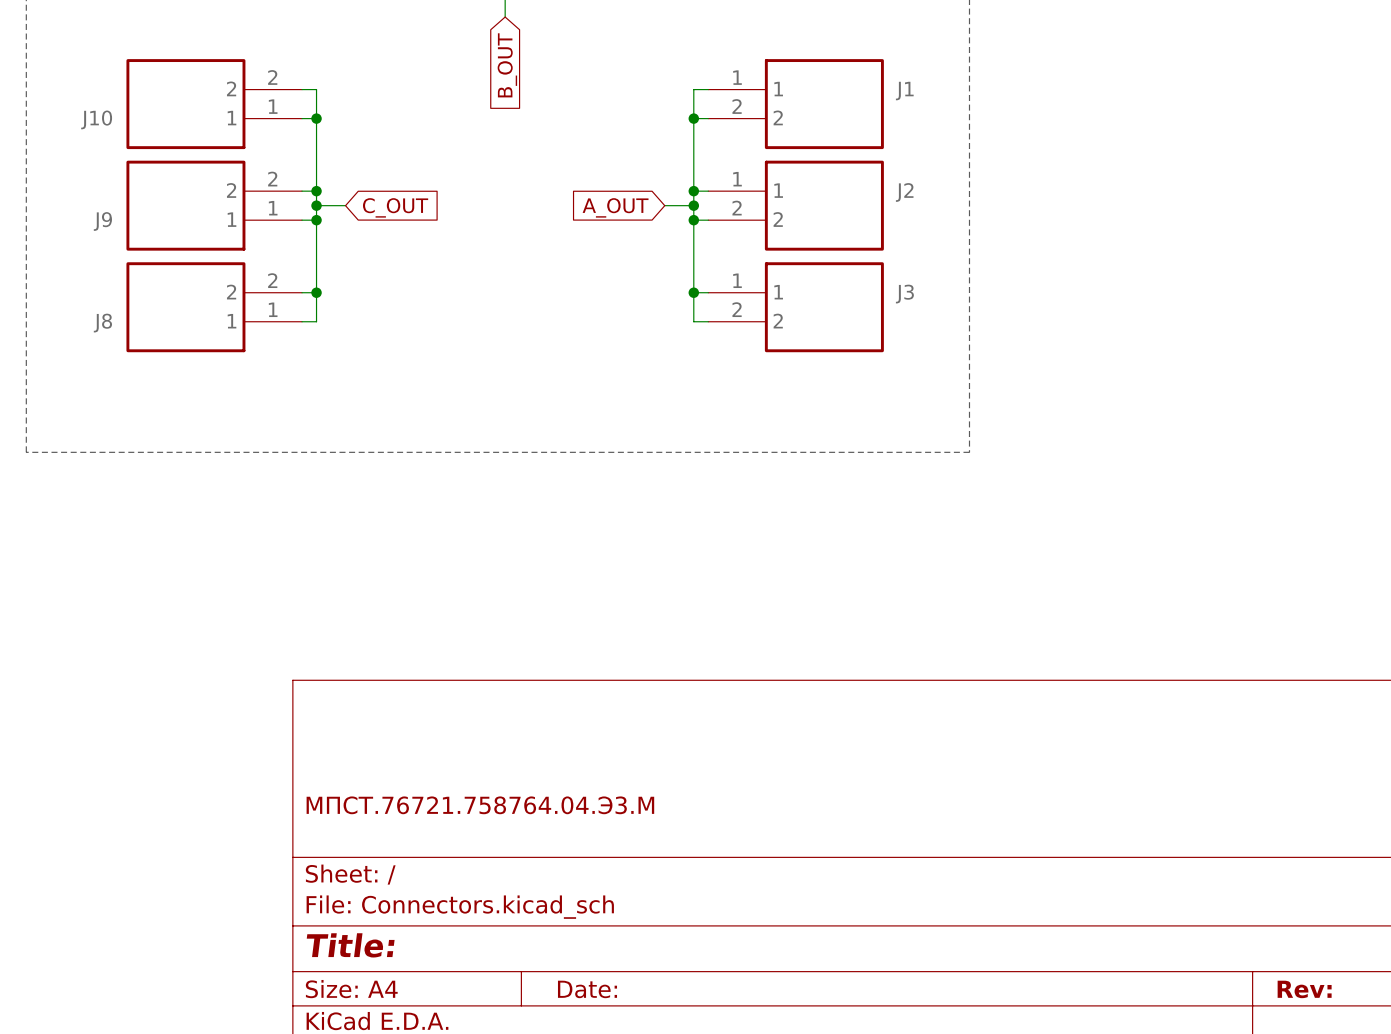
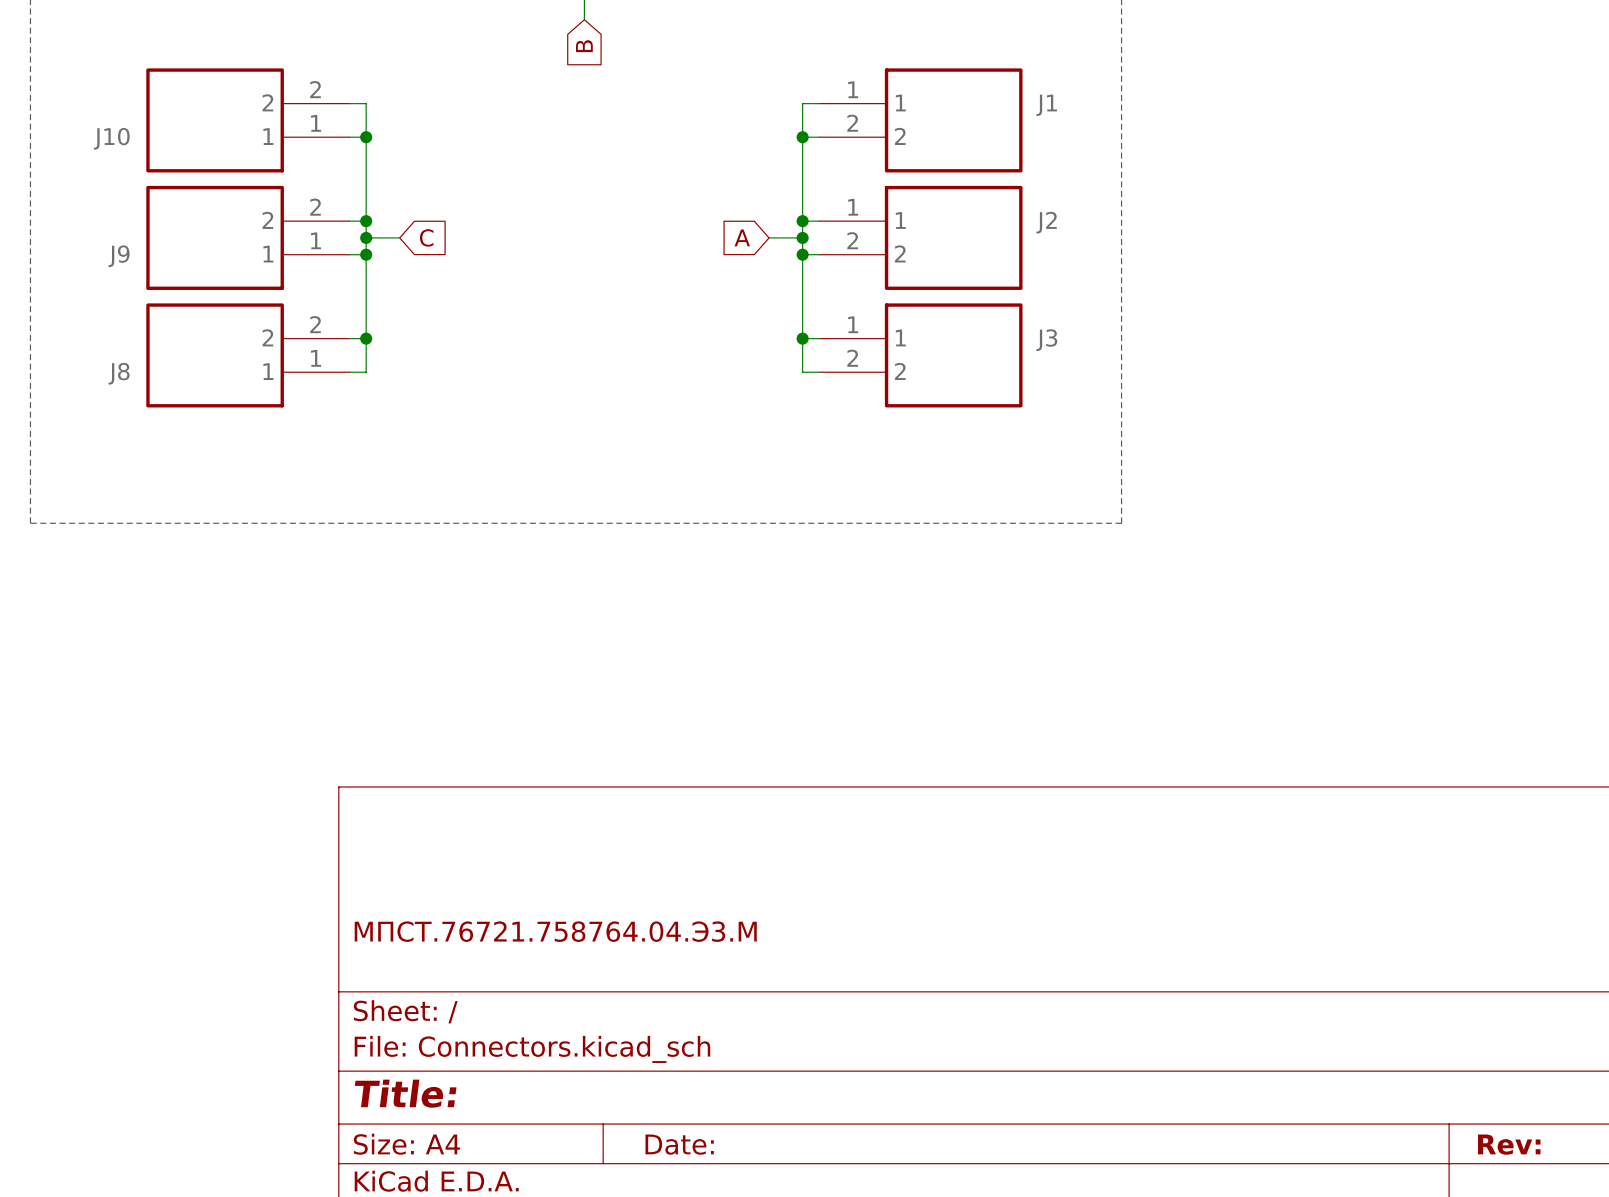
global label: B_OUT (507, 65) -> B (584, 46)
global label: C_OUT (395, 207) -> C (426, 237)
global label: A_OUT (615, 207) -> A (742, 237)

